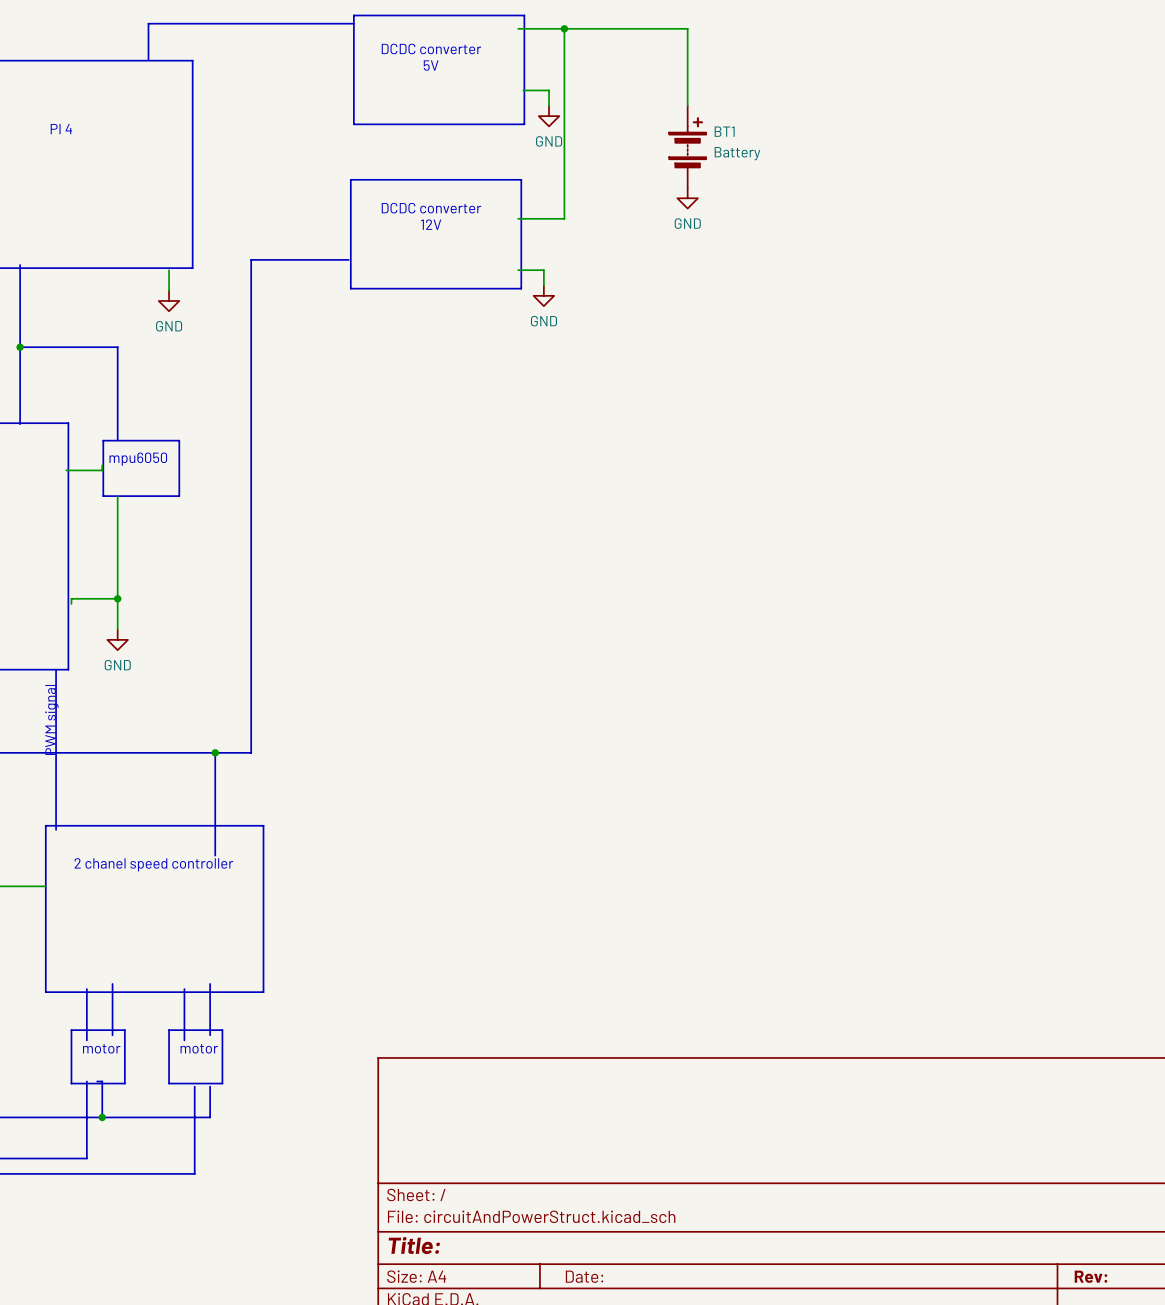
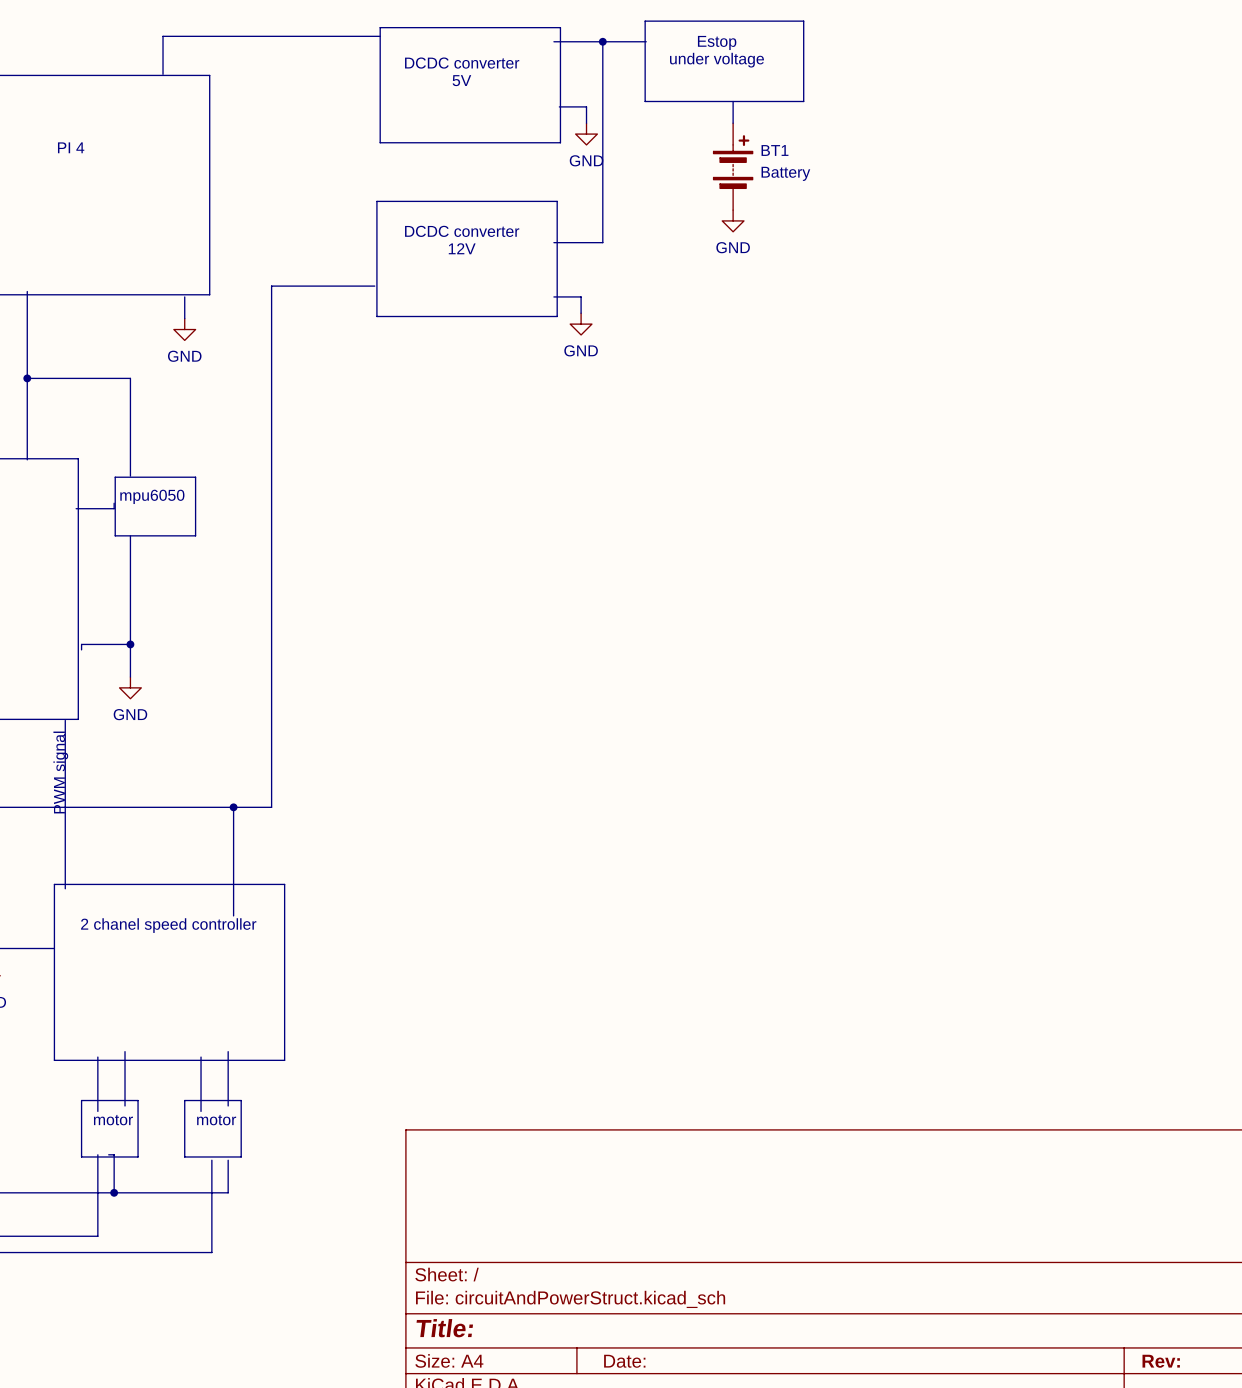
line: none -> (645, 21) (803, 21) (803, 101) (645, 101) (645, 21)
wire: (605, 28) (687, 28) (687, 85) -> none
text: none -> Estop (717, 42)
text: none -> under voltage (716, 60)

